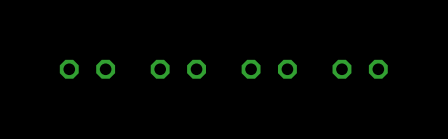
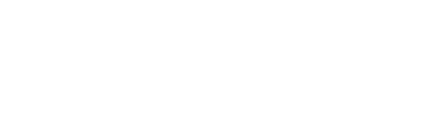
part: (87, 69) -> none
part: (178, 69) -> none
part: (269, 69) -> none
part: (360, 69) -> none

